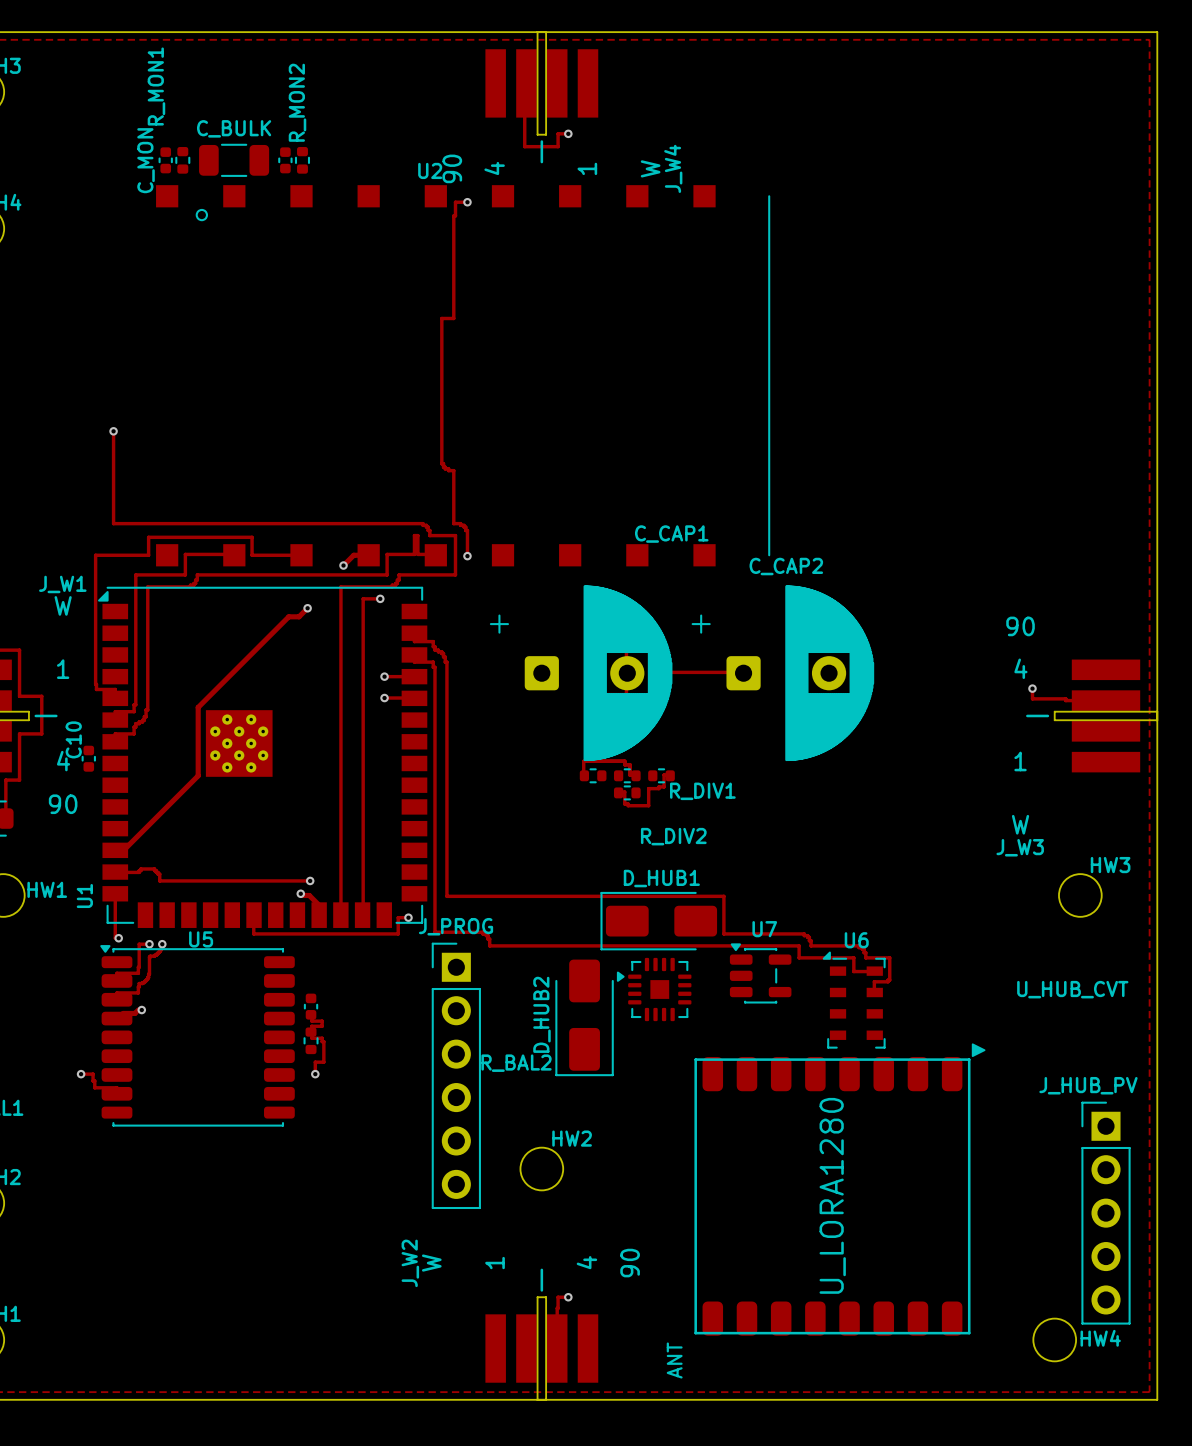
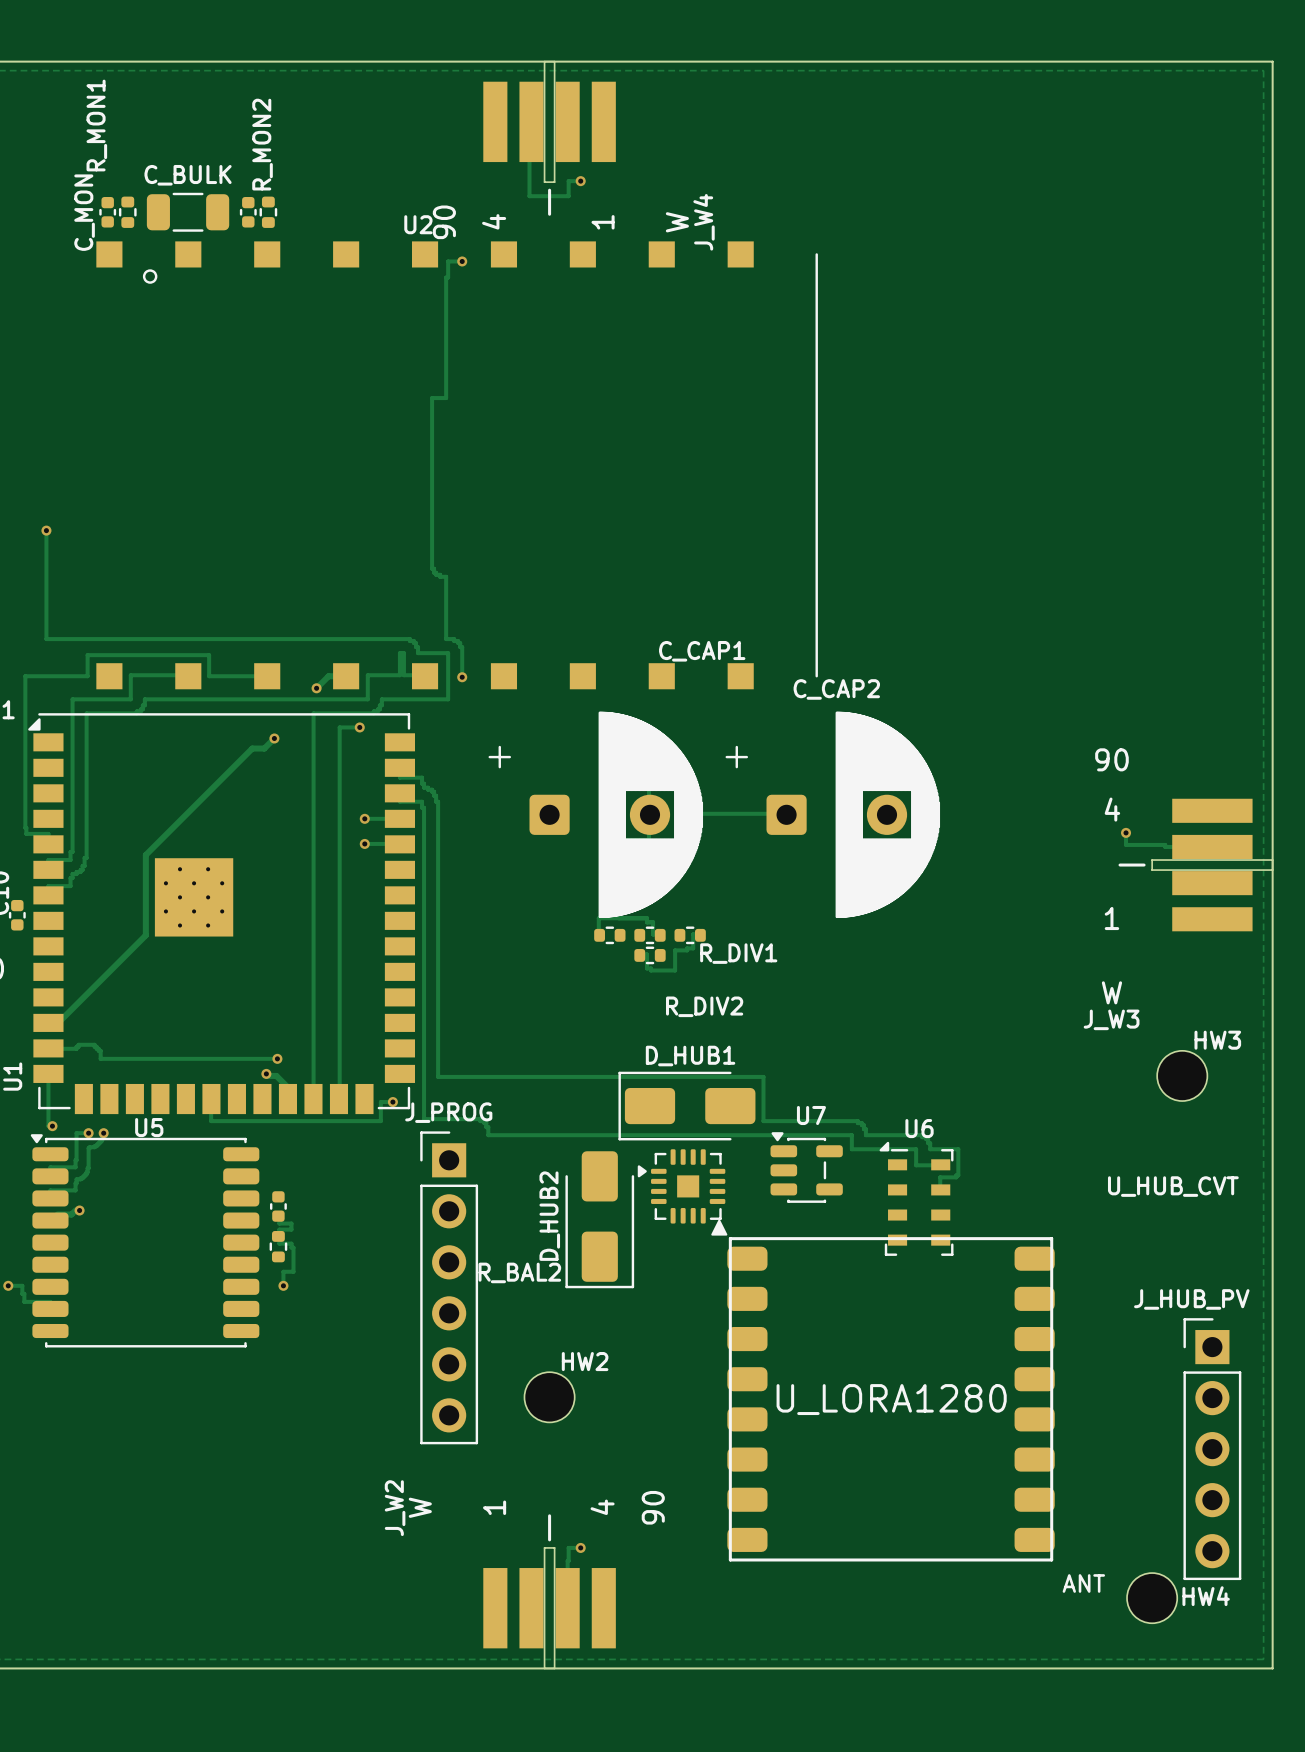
U_LORA1280 rotation: 0° (839, 1189) -> 90° counterclockwise (882, 1390)

